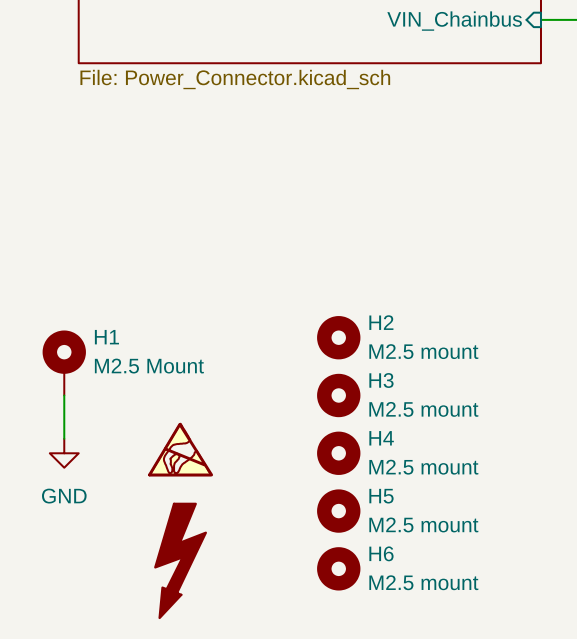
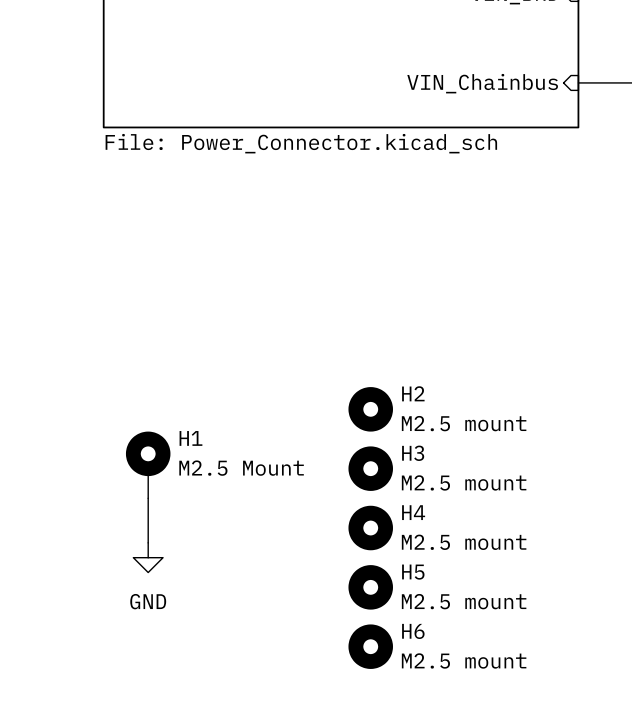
H1 position: (64, 362) -> (148, 464)
wire: (64, 395) (64, 438) -> (148, 498) (148, 542)
power symbol: (180, 449) -> none
power symbol position: GND (64, 453) -> GND (148, 557)
power symbol: (180, 560) -> none

